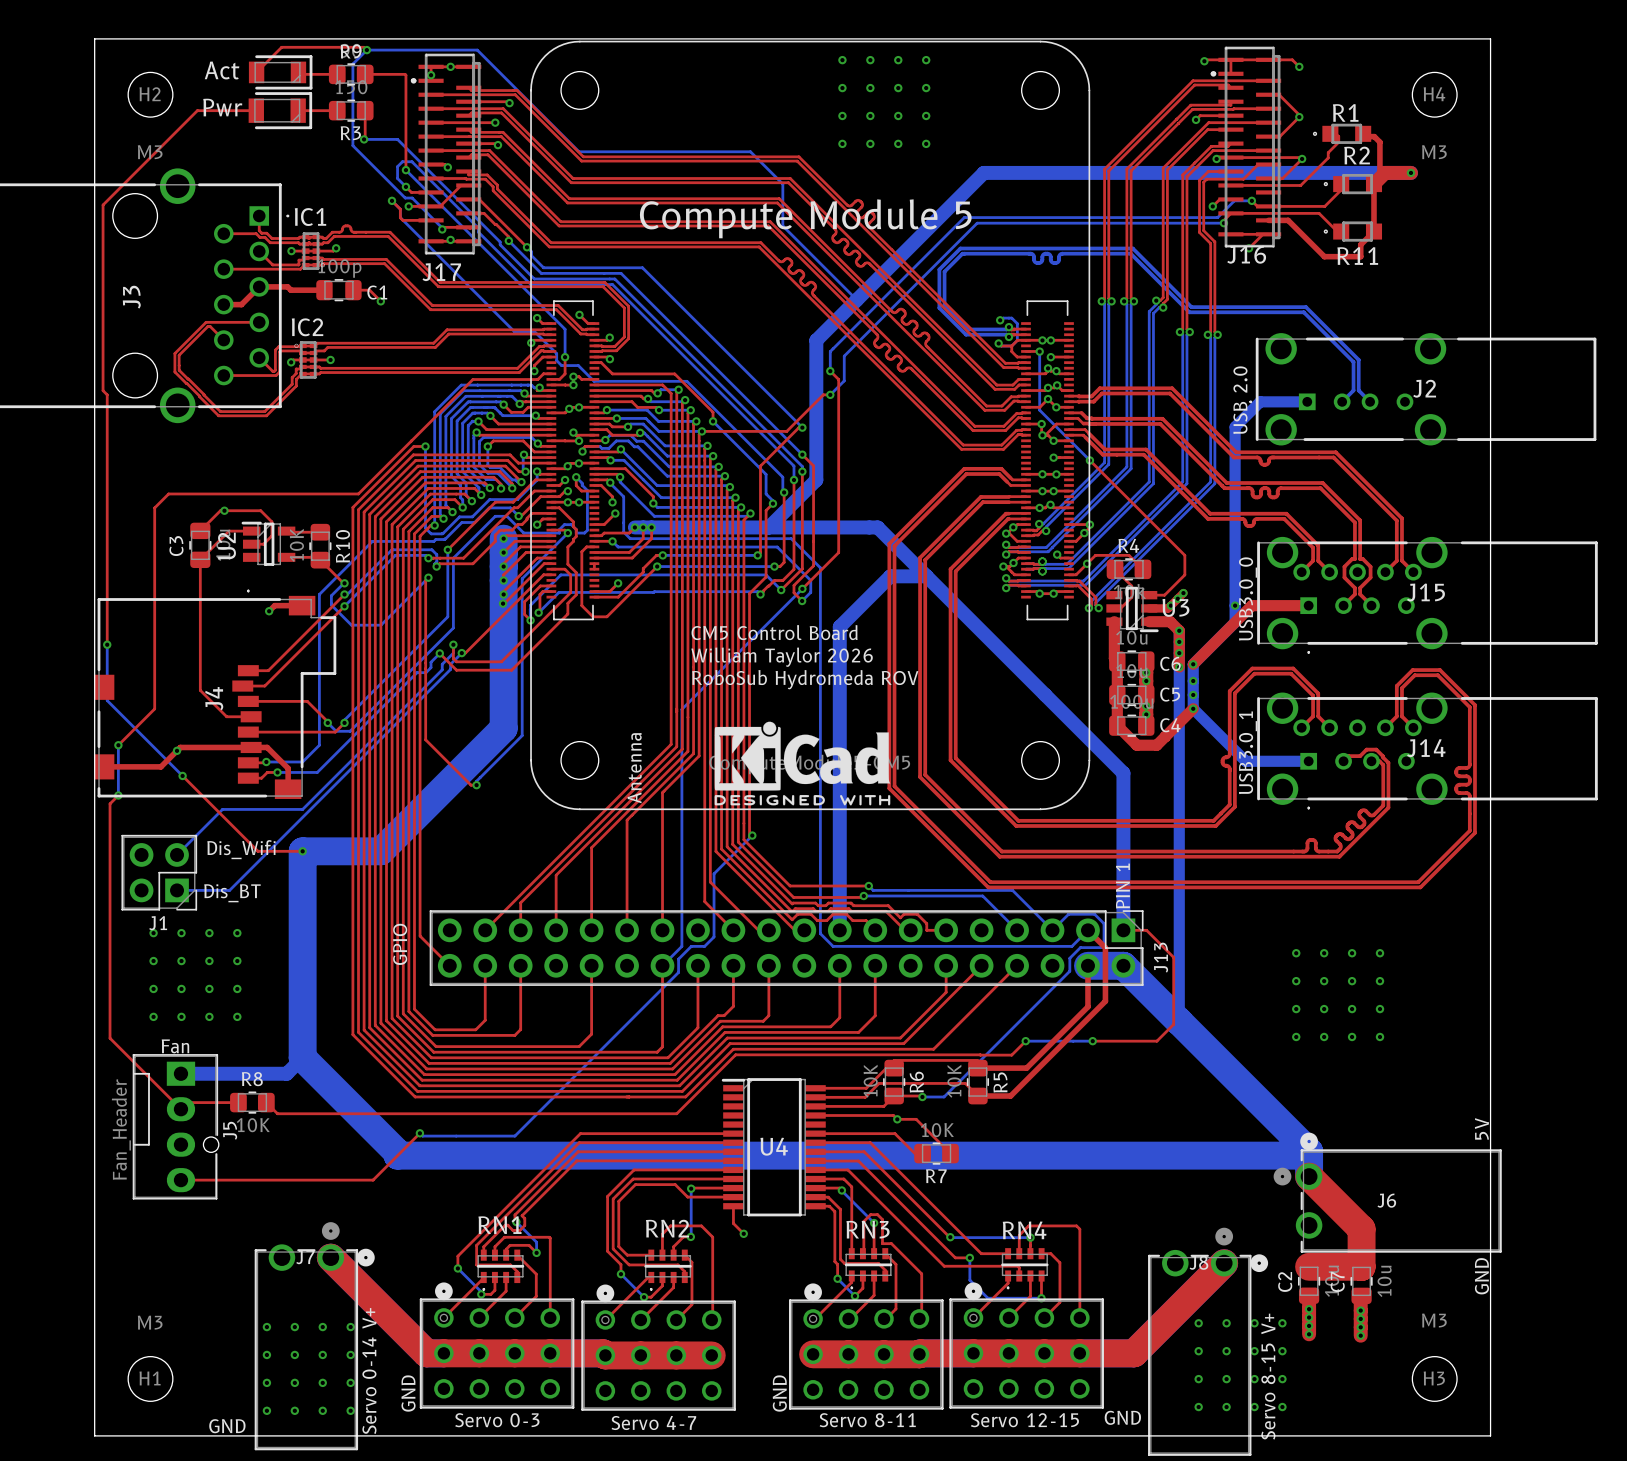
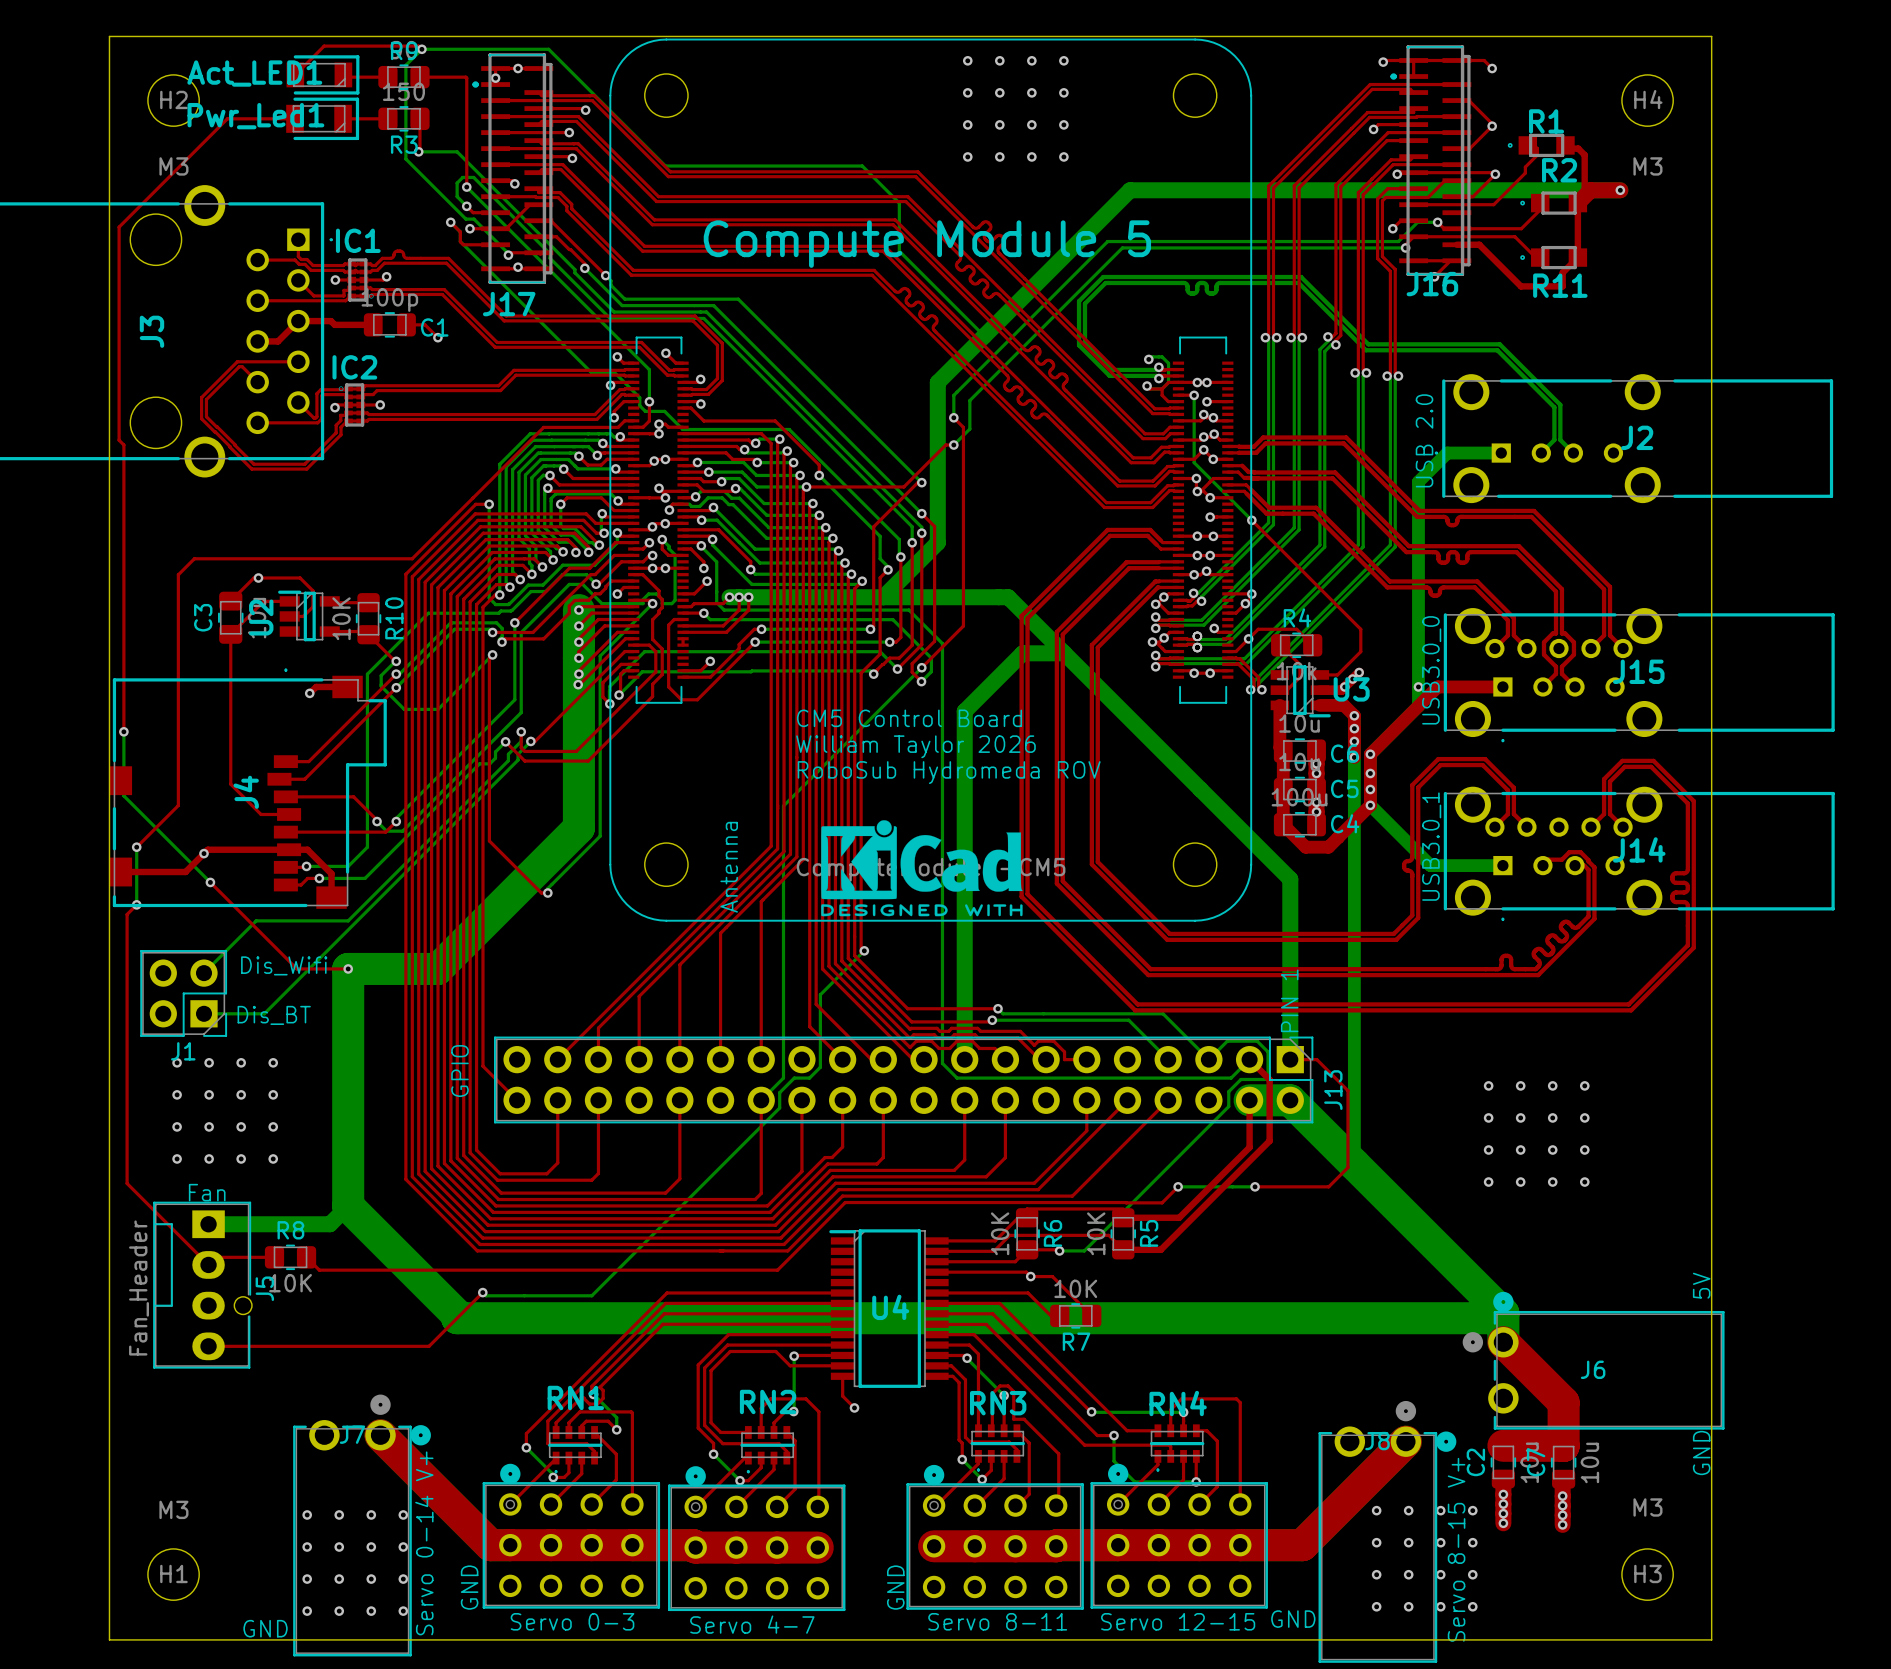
Act name: Act (222, 70) -> Act_LED1 (254, 73)
Pwr name: Pwr (222, 107) -> Pwr_Led1 (255, 116)
top track: none -> (1370, 754) (1370, 805)

